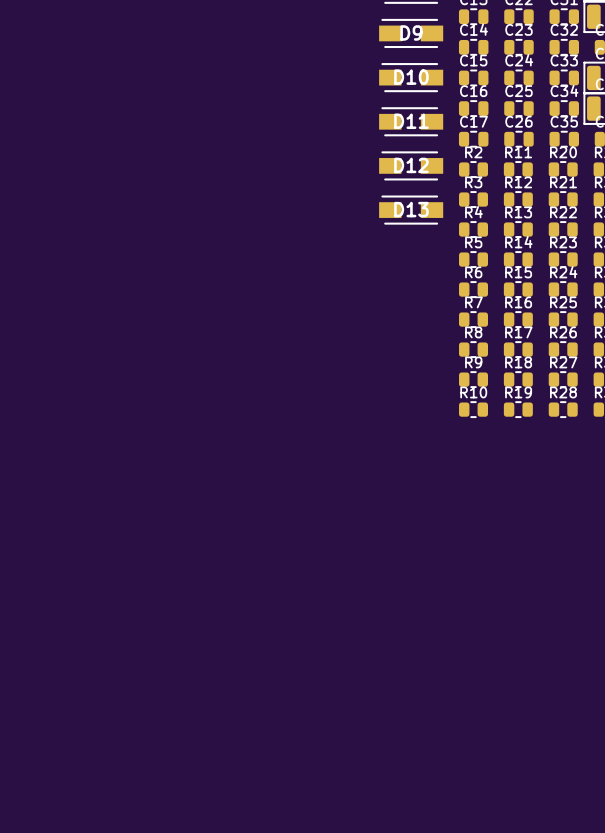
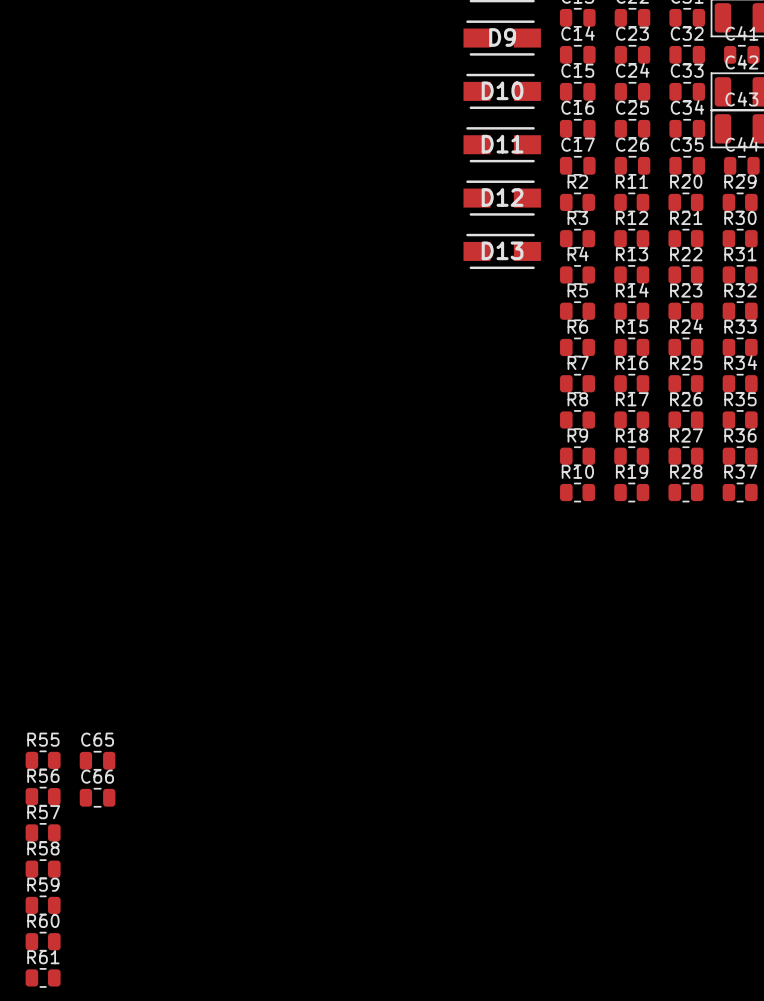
R55: none -> (43, 760)
C65: none -> (97, 760)
R56: none -> (43, 796)
C66: none -> (97, 797)
R57: none -> (43, 832)
R58: none -> (43, 869)
R59: none -> (43, 905)
R60: none -> (43, 941)
R61: none -> (43, 977)

